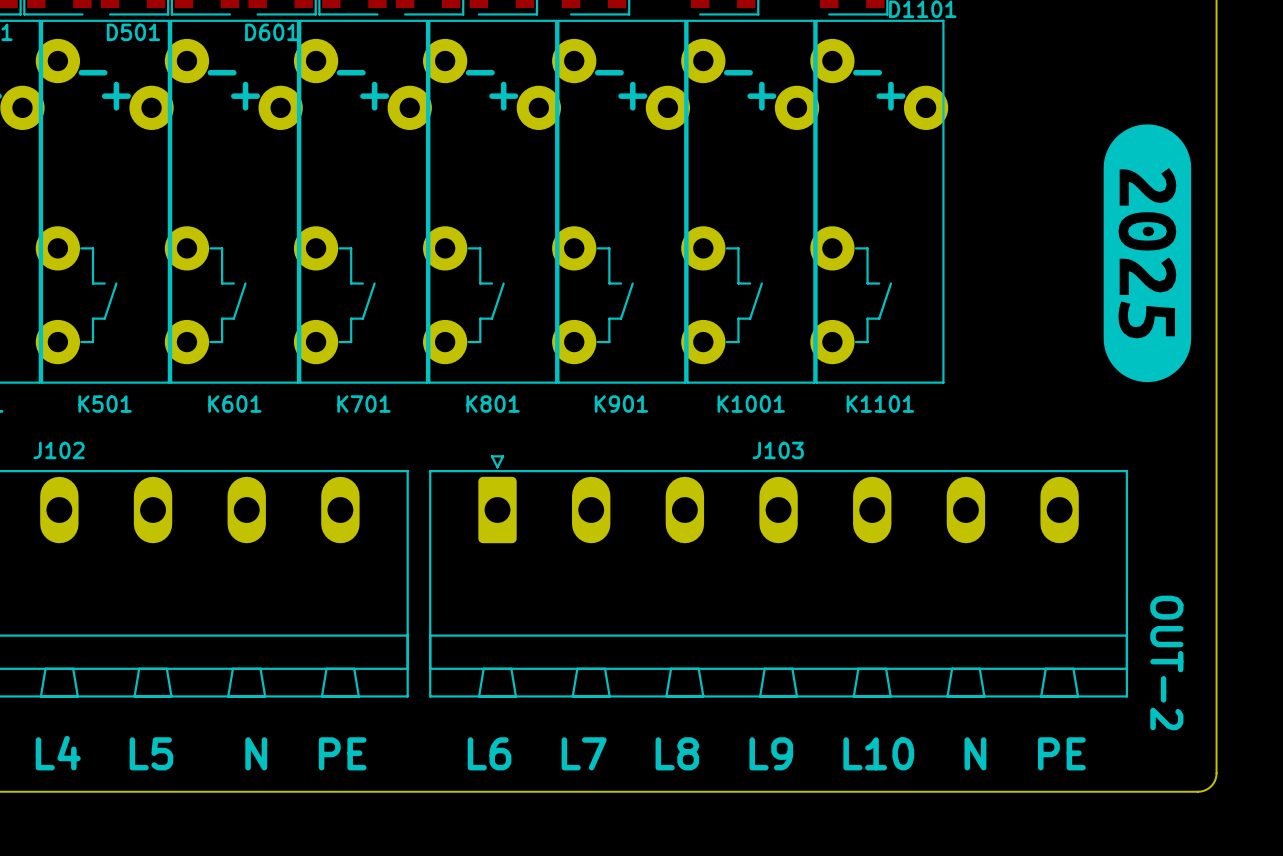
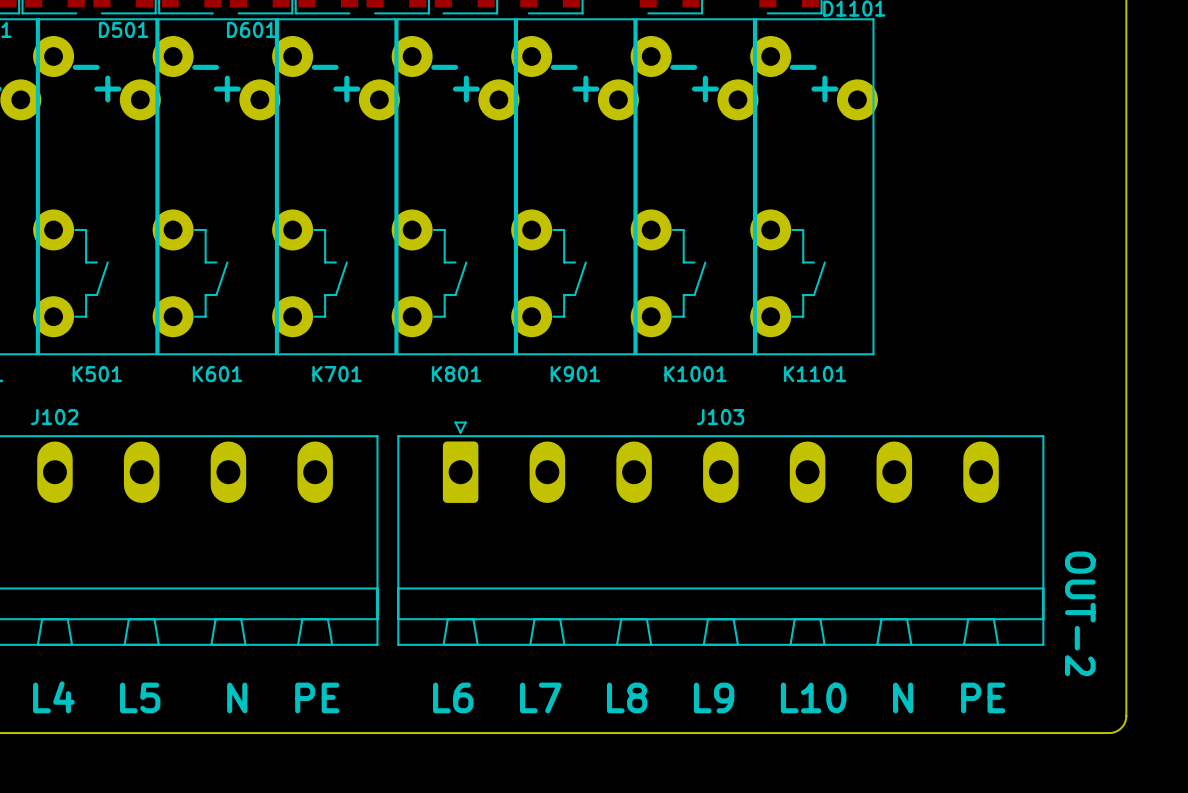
drawing: [1103, 124, 1192, 383] -> none

